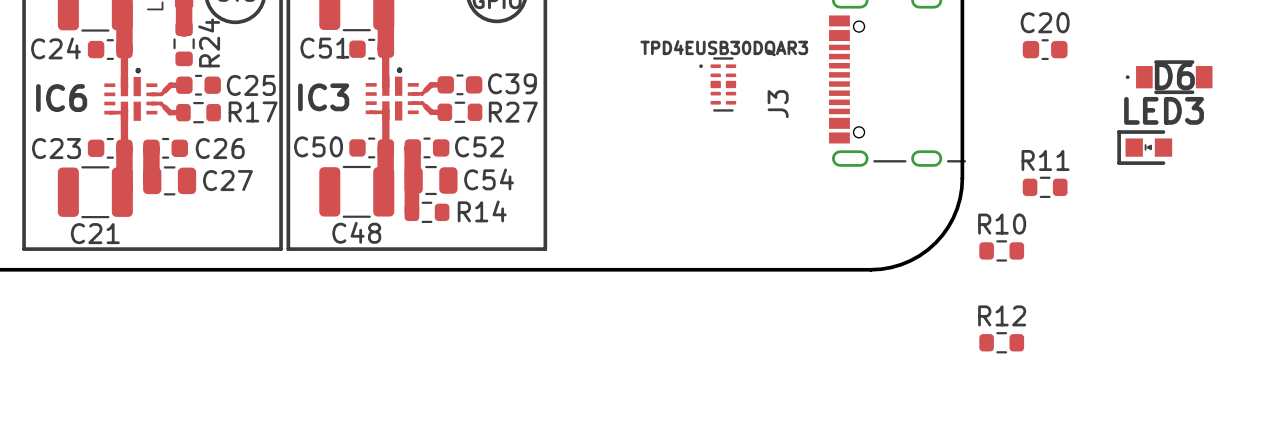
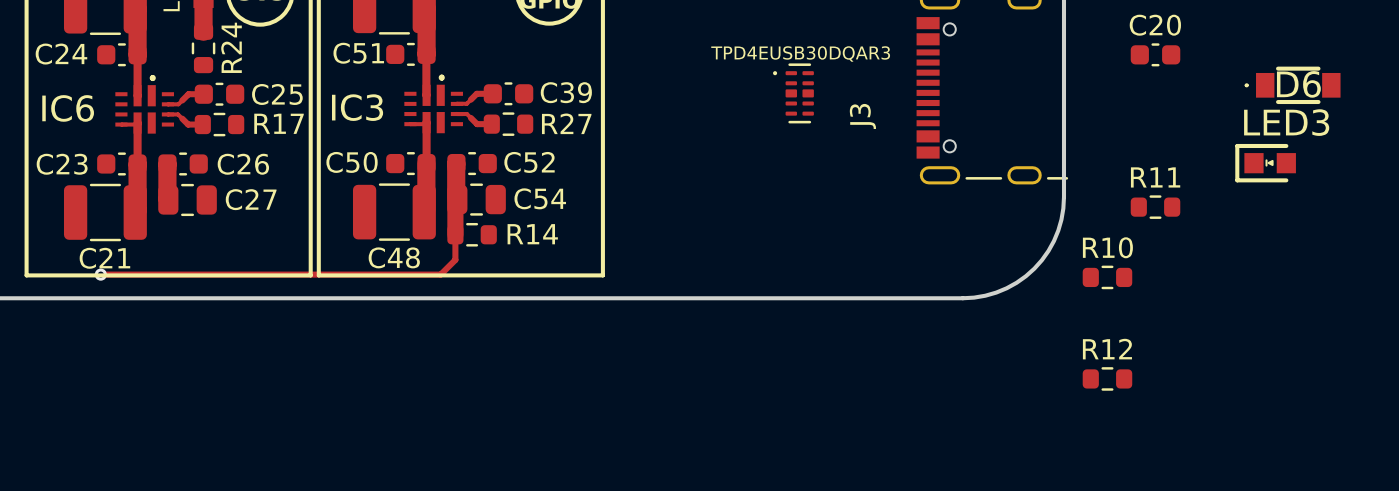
track: none -> (455, 234) (455, 259) (440, 274) (100, 274)
via: none -> (100, 274)

